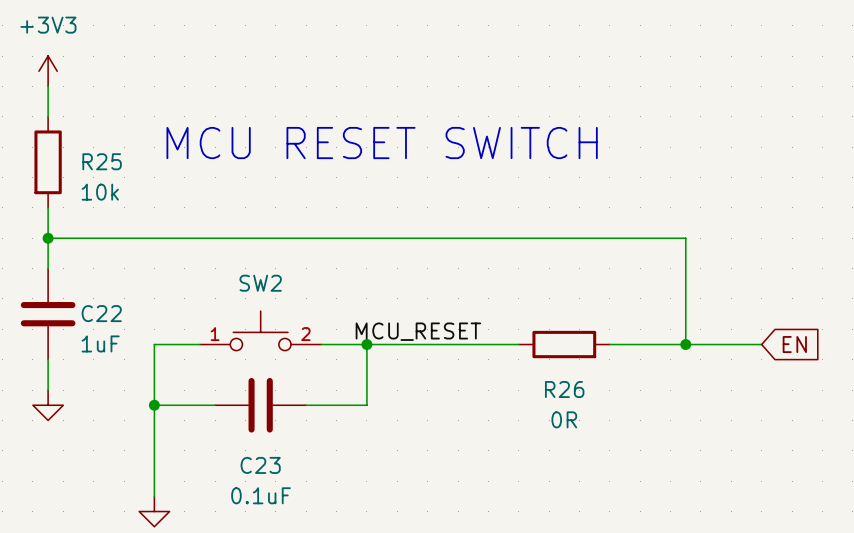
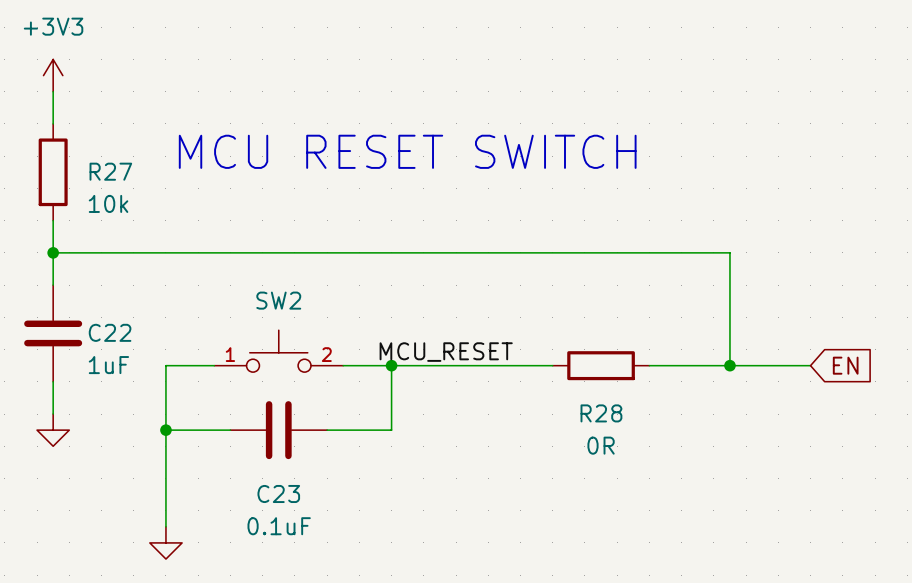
R25 name: R25 (102, 161) -> R27 (110, 171)
R26 name: R26 (564, 389) -> R28 (601, 413)

